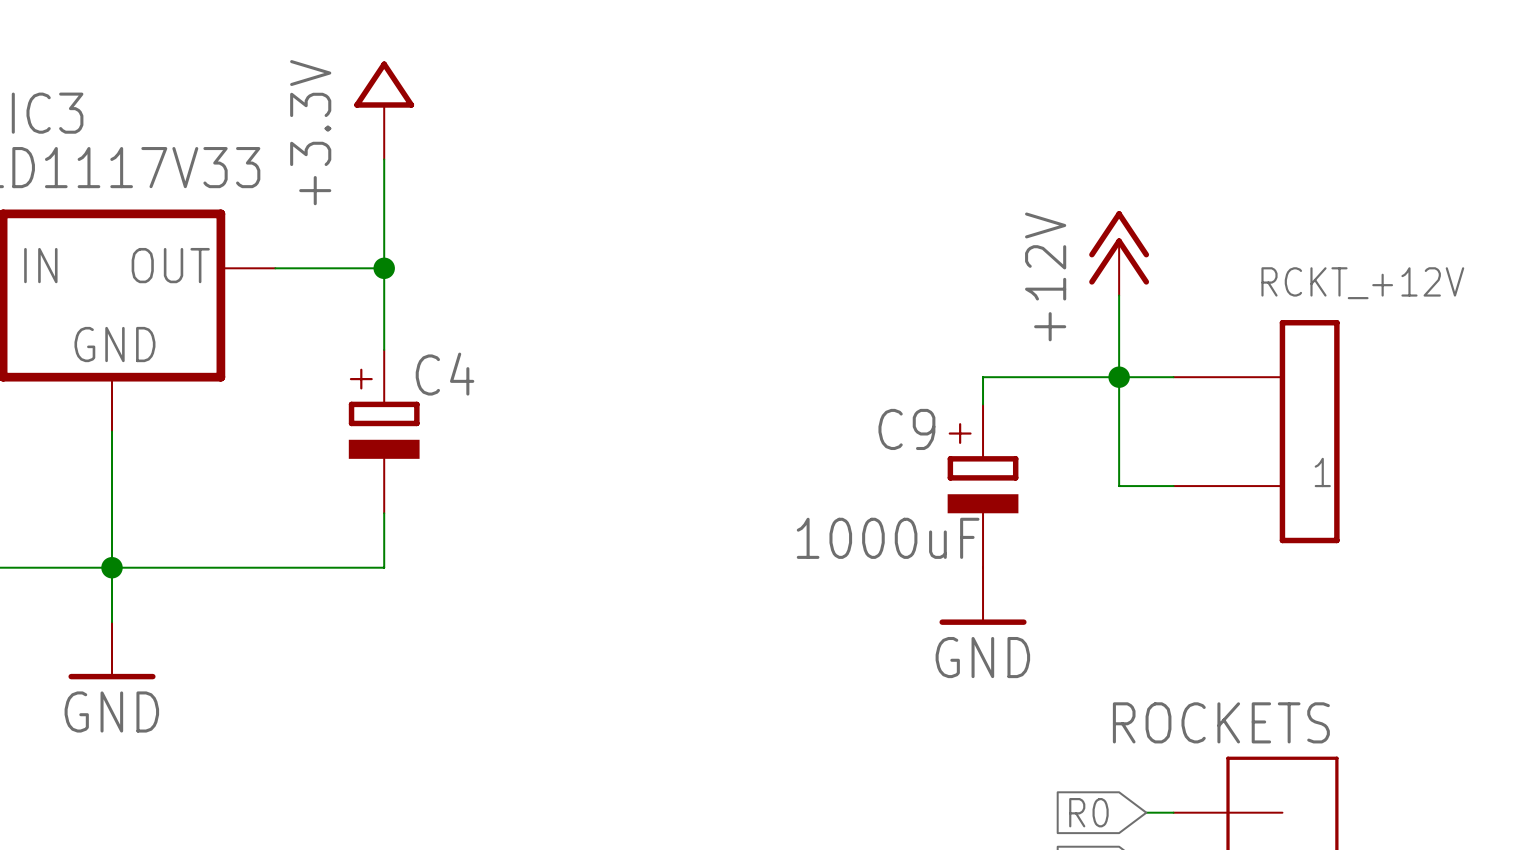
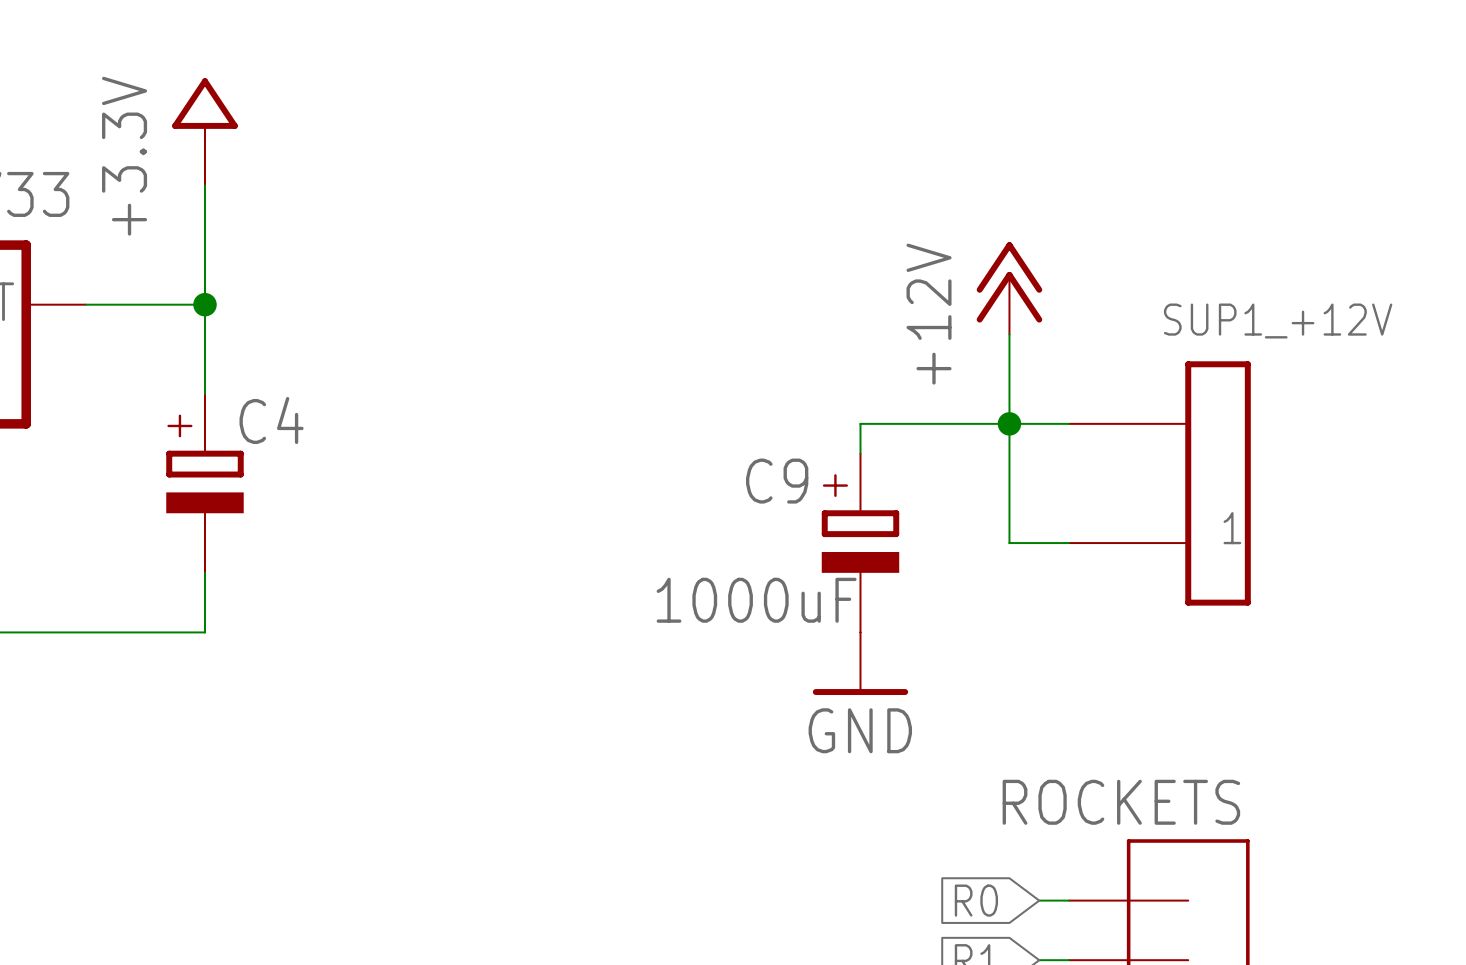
RCKT_+12V name: RCKT_+12V (1362, 283) -> SUP1_+12V (1278, 321)

